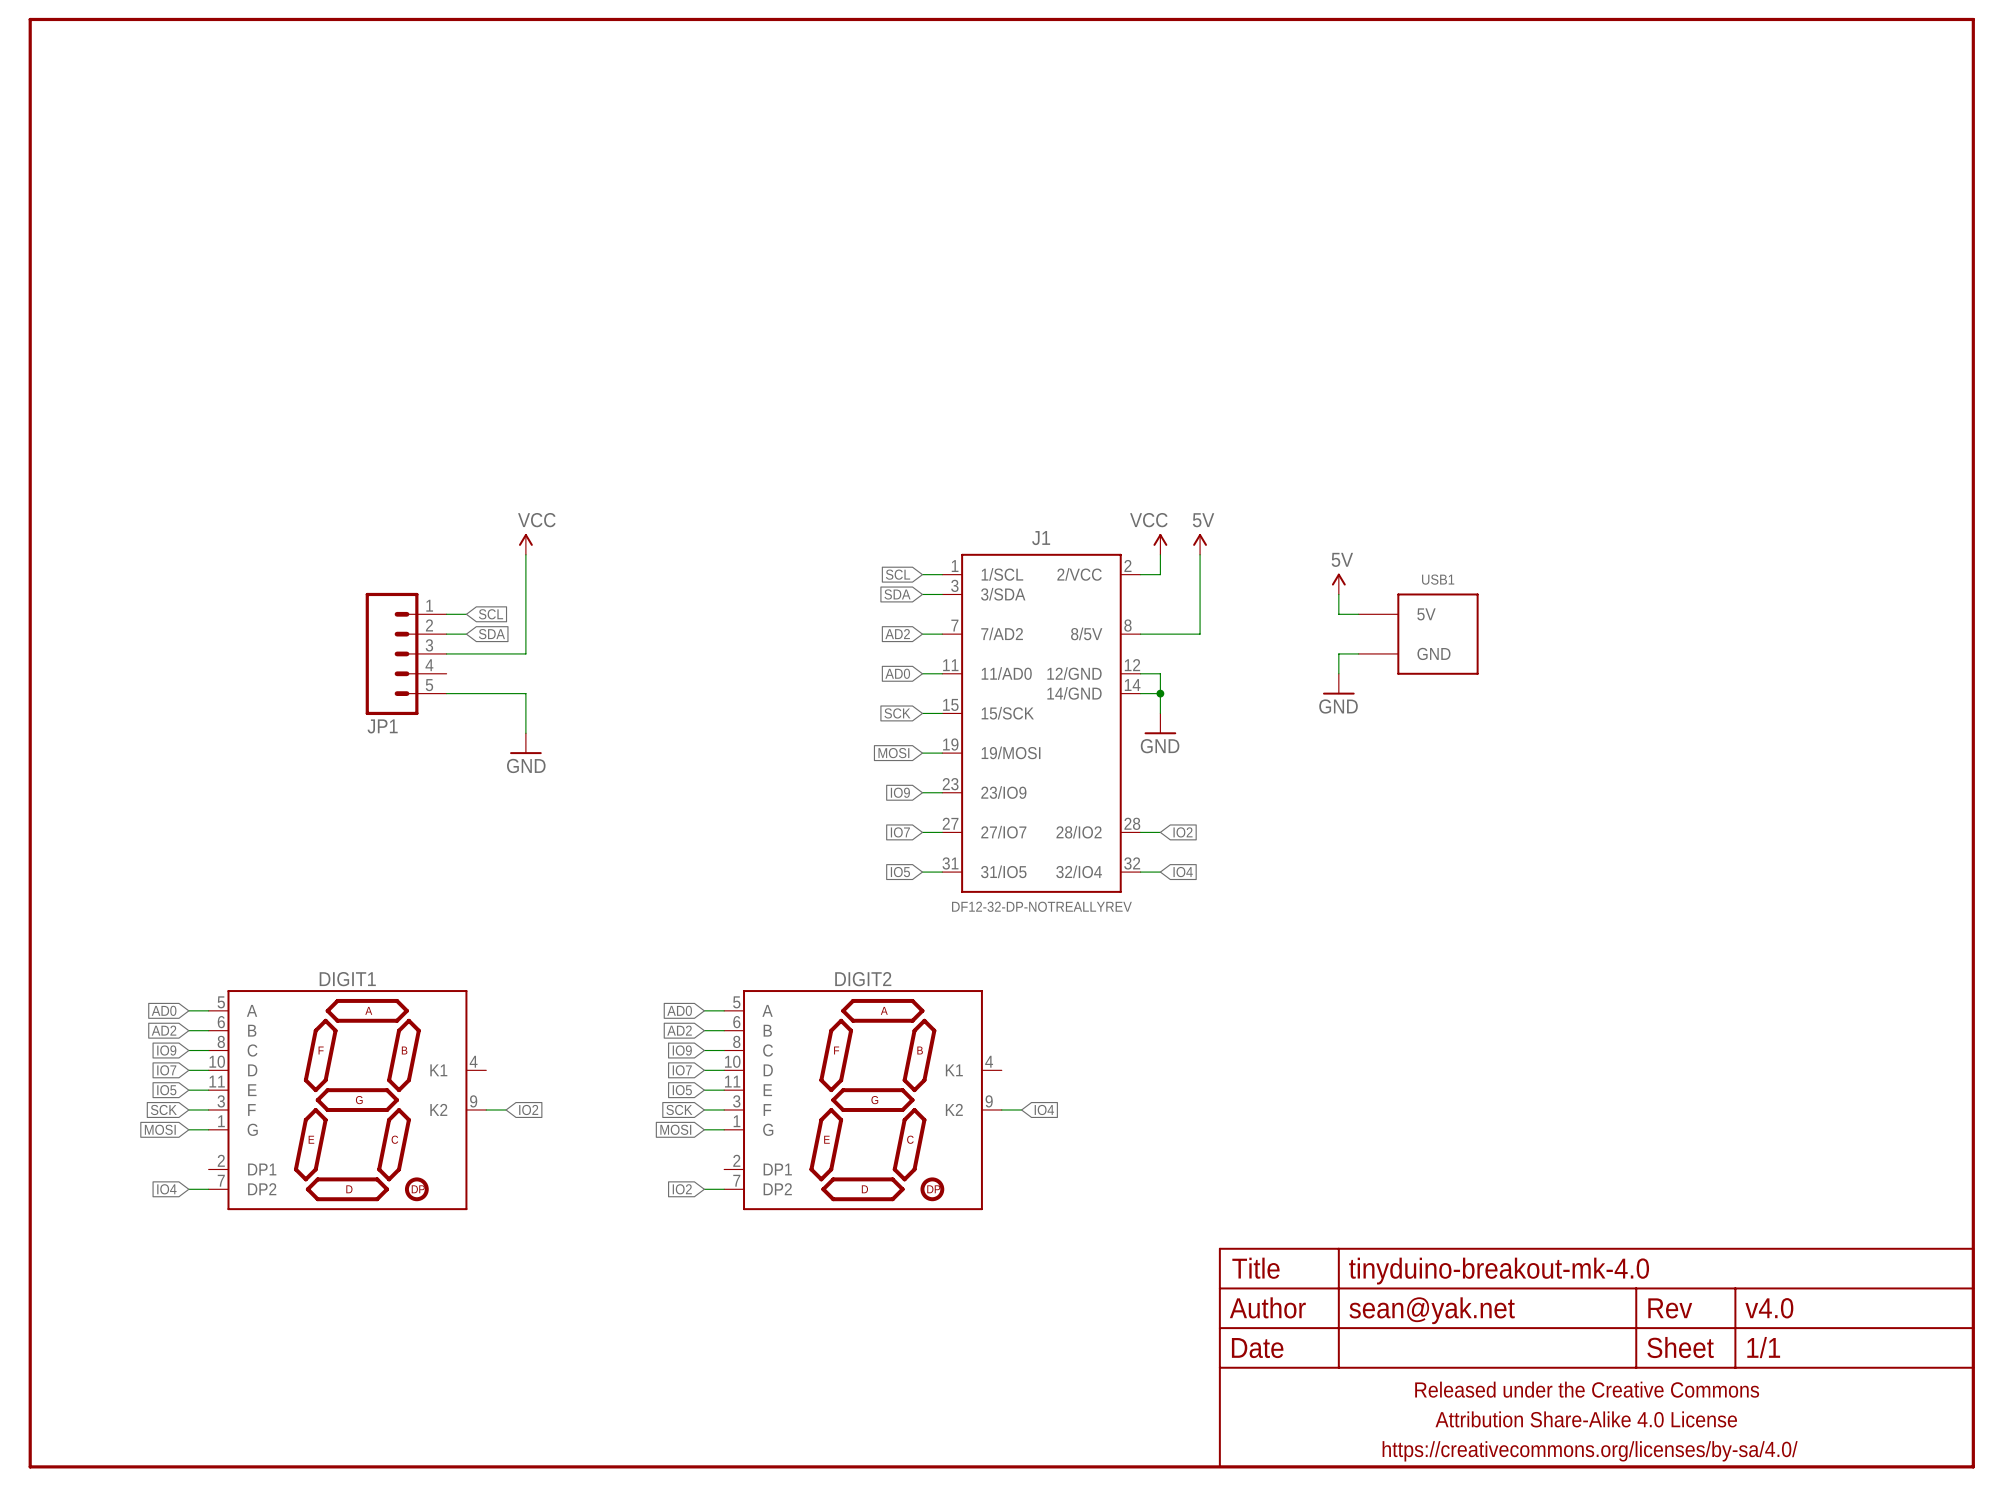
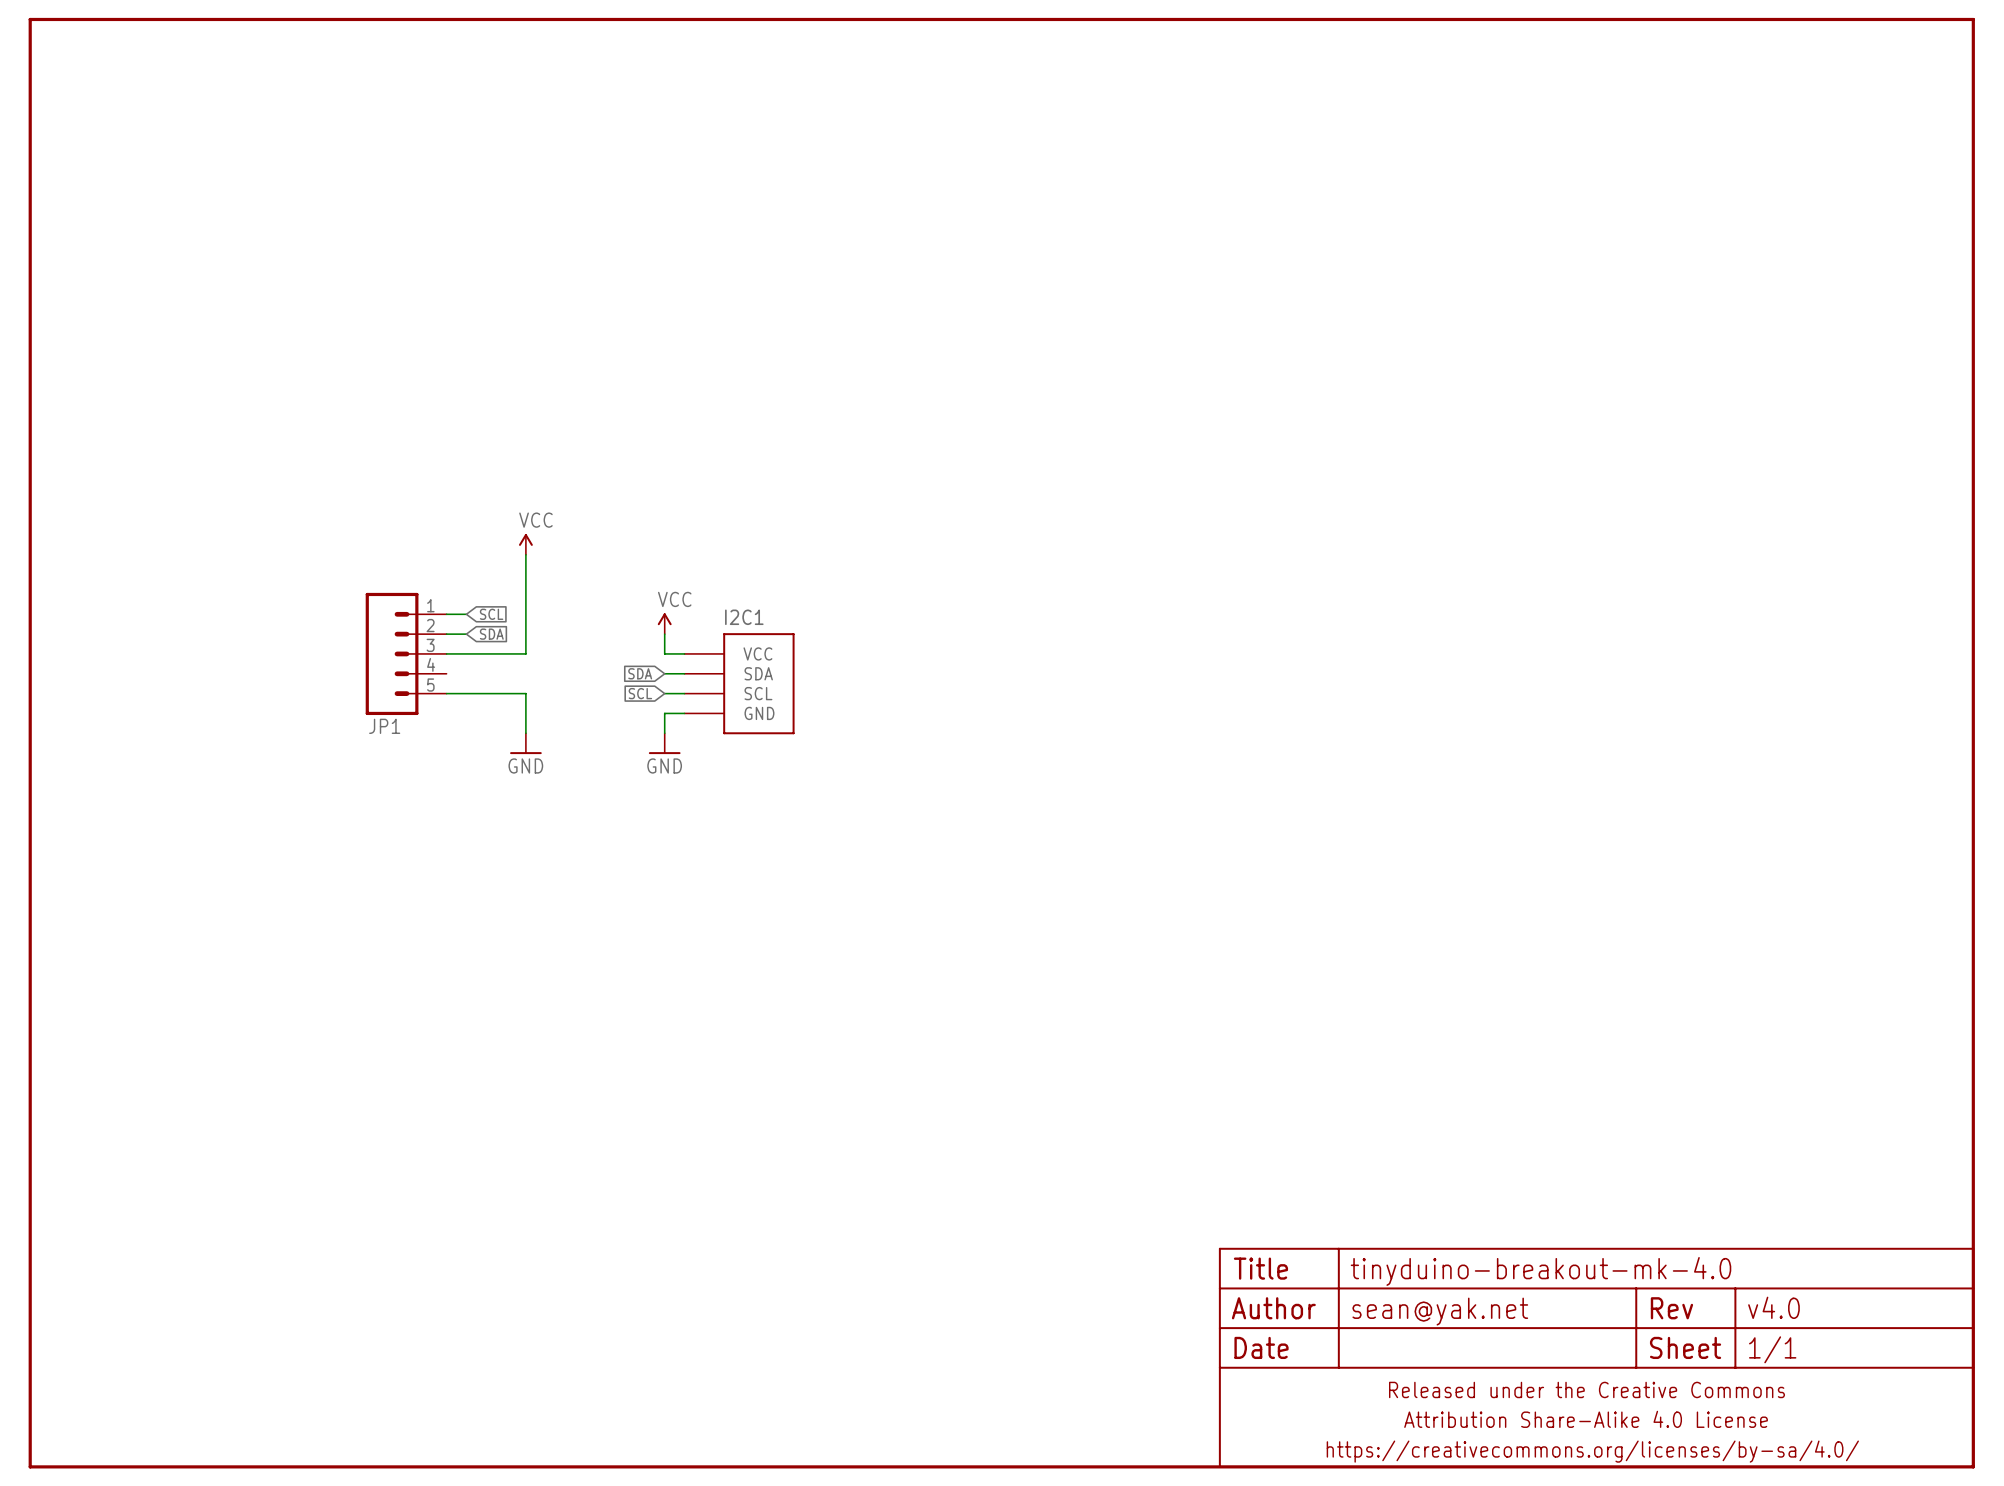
power symbol: VCC (1160, 544) -> none
power symbol: 5V (1200, 544) -> none
wire: (1160, 554) (1160, 574) (1140, 574) -> none
wire: (1200, 554) (1200, 634) (1140, 634) -> none
global label: SCL (898, 574) -> none
wire: (922, 574) (942, 574) -> none
power symbol: 5V (1338, 584) -> none
global label: SDA (897, 594) -> none
wire: (922, 594) (942, 594) -> none
wire: (1338, 594) (1338, 614) (1358, 614) -> none
power symbol: none -> VCC (664, 623)
wire: none -> (664, 634) (664, 653) (684, 653)
global label: AD2 (897, 634) -> none
wire: (922, 634) (942, 634) -> none
USB1: (1418, 634) -> none
wire: (1358, 653) (1338, 653) (1338, 673) -> none
global label: none -> SDA (640, 673)
wire: none -> (664, 673) (684, 673)
global label: AD0 (897, 673) -> none
wire: (922, 673) (942, 673) -> none
wire: (1140, 673) (1160, 673) (1160, 713) -> none
I2C1: none -> (739, 683)
power symbol: GND (1338, 684) -> none
global label: none -> SCL (640, 693)
wire: none -> (664, 693) (684, 693)
wire: (1140, 693) (1160, 693) -> none
junction: (1160, 693) -> none
wire: none -> (684, 713) (664, 713) (664, 733)
global label: SCK (897, 713) -> none
wire: (922, 713) (942, 713) -> none
J1: DF12-32-DP-NOTREALLYREV (1041, 723) -> none
power symbol: GND (1160, 723) -> none
power symbol: none -> GND (664, 743)
global label: MOSI (893, 753) -> none
wire: (922, 753) (942, 753) -> none
global label: IO9 (900, 792) -> none
wire: (922, 792) (942, 792) -> none
global label: IO7 (900, 832) -> none
wire: (922, 832) (942, 832) -> none
wire: (1140, 832) (1160, 832) -> none
global label: IO2 (1183, 832) -> none
global label: IO5 (900, 872) -> none
wire: (922, 872) (942, 872) -> none
wire: (1140, 872) (1160, 872) -> none
global label: IO4 (1183, 872) -> none
global label: AD0 (164, 1010) -> none
wire: (188, 1010) (208, 1010) -> none
global label: AD0 (679, 1010) -> none
wire: (704, 1010) (724, 1010) -> none
global label: AD2 (164, 1030) -> none
wire: (188, 1030) (208, 1030) -> none
global label: AD2 (679, 1030) -> none
wire: (704, 1030) (724, 1030) -> none
global label: IO9 (166, 1050) -> none
wire: (188, 1050) (208, 1050) -> none
global label: IO9 (682, 1050) -> none
wire: (704, 1050) (724, 1050) -> none
global label: IO7 (166, 1070) -> none
wire: (188, 1070) (208, 1070) -> none
global label: IO7 (682, 1070) -> none
wire: (704, 1070) (724, 1070) -> none
global label: IO5 (166, 1090) -> none
wire: (188, 1090) (208, 1090) -> none
global label: IO5 (682, 1090) -> none
wire: (704, 1090) (724, 1090) -> none
DIGIT1: (347, 1100) -> none
DIGIT2: (862, 1100) -> none
global label: SCK (163, 1109) -> none
wire: (188, 1109) (208, 1109) -> none
wire: (486, 1109) (506, 1109) -> none
global label: IO2 (528, 1109) -> none
global label: SCK (679, 1109) -> none
wire: (704, 1109) (724, 1109) -> none
wire: (1001, 1109) (1021, 1109) -> none
global label: IO4 (1044, 1109) -> none
global label: MOSI (160, 1129) -> none
wire: (188, 1129) (208, 1129) -> none
global label: MOSI (675, 1129) -> none
wire: (704, 1129) (724, 1129) -> none
global label: IO4 (166, 1189) -> none
wire: (188, 1189) (208, 1189) -> none
global label: IO2 (682, 1189) -> none
wire: (704, 1189) (724, 1189) -> none

